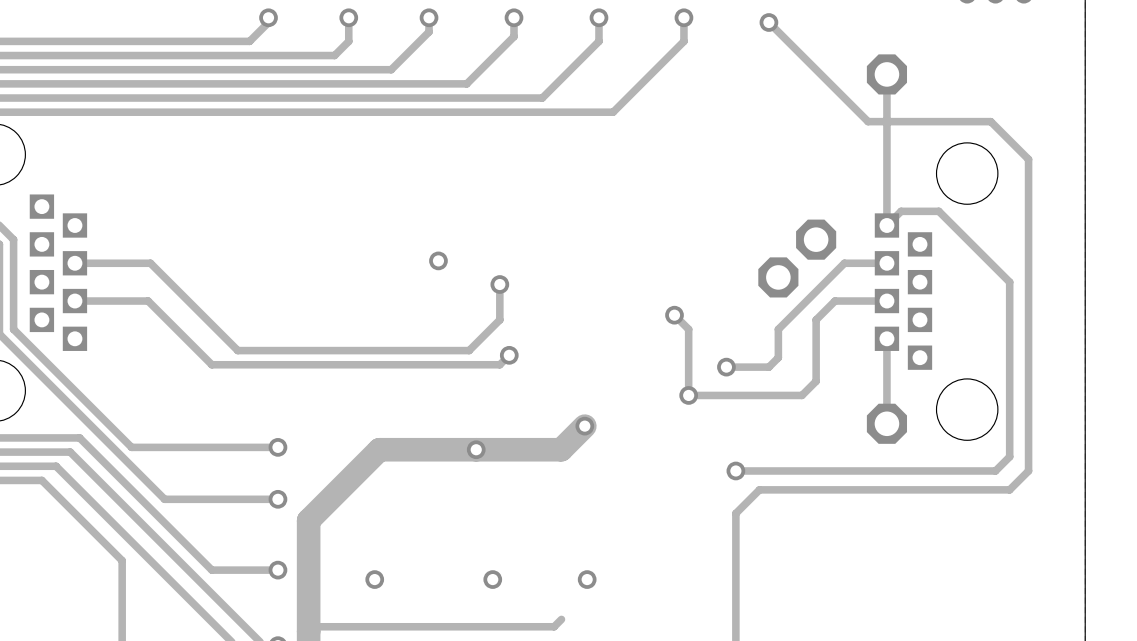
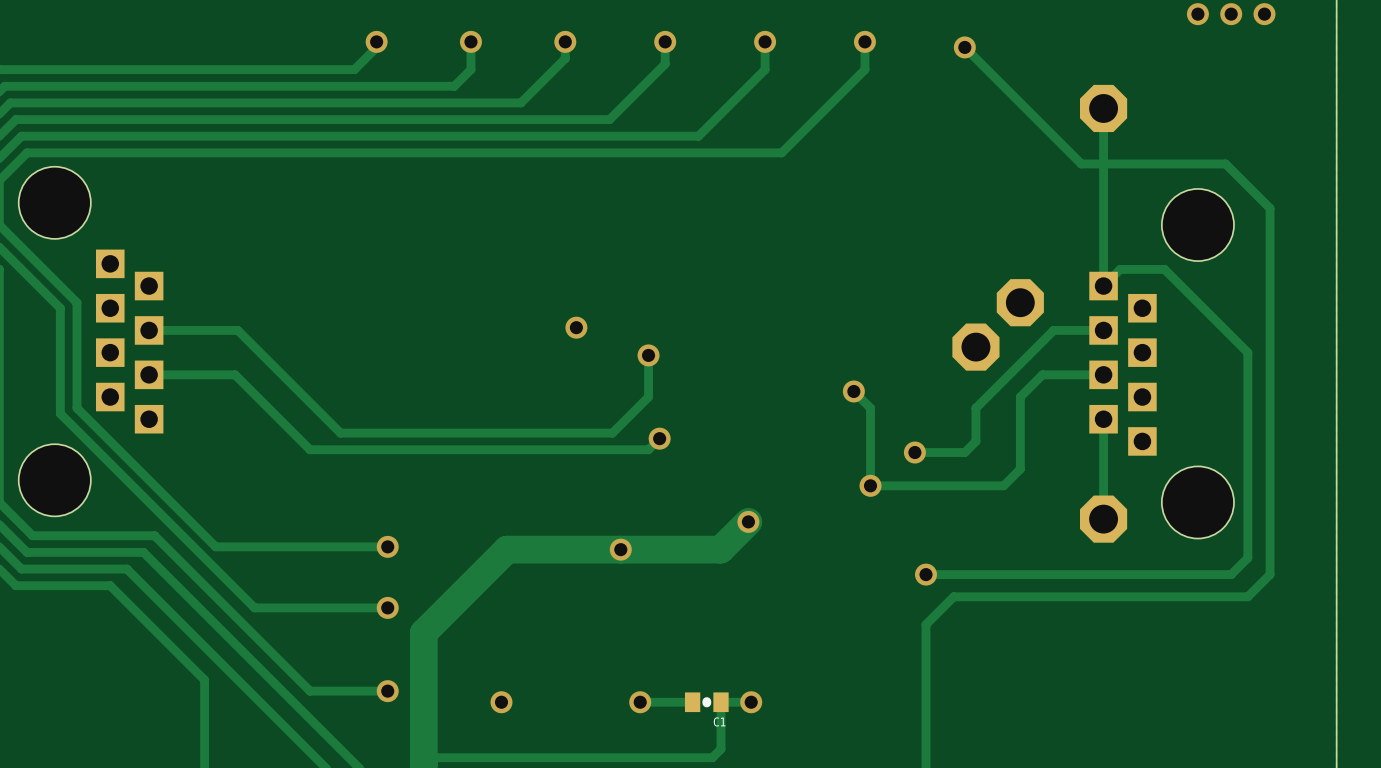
track: none -> (692, 702) (640, 702)
C1: none -> (706, 702)
track: none -> (751, 702) (721, 702) (721, 749)

